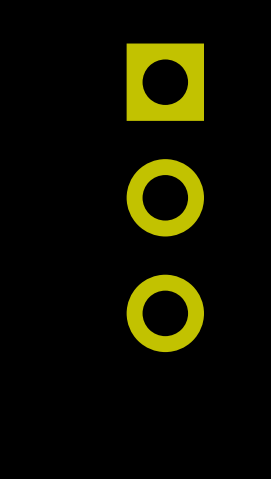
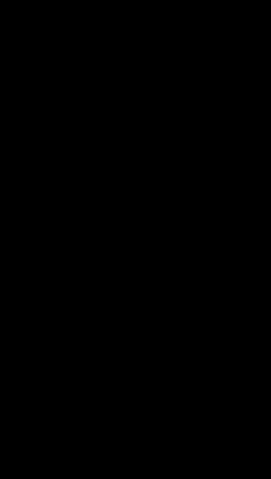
part: (165, 197) -> none

